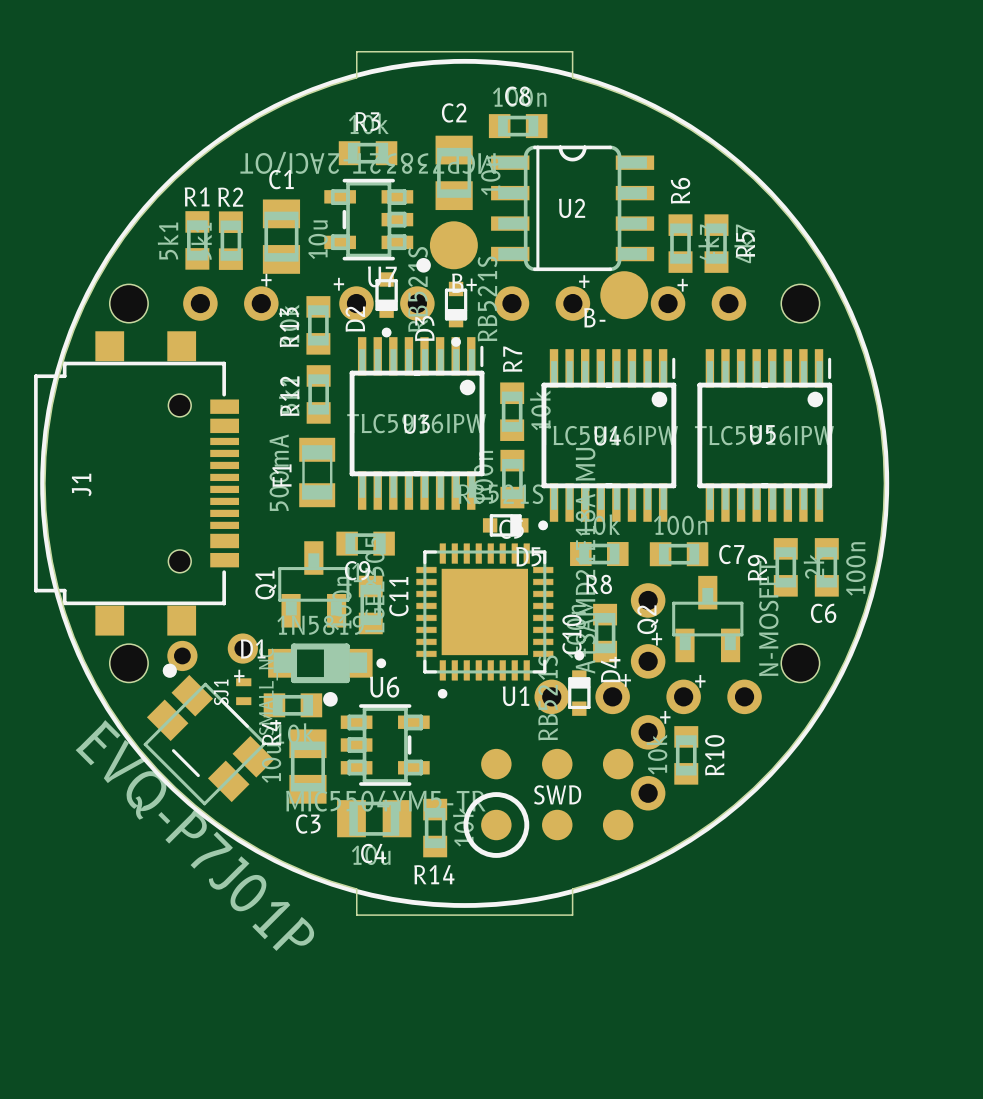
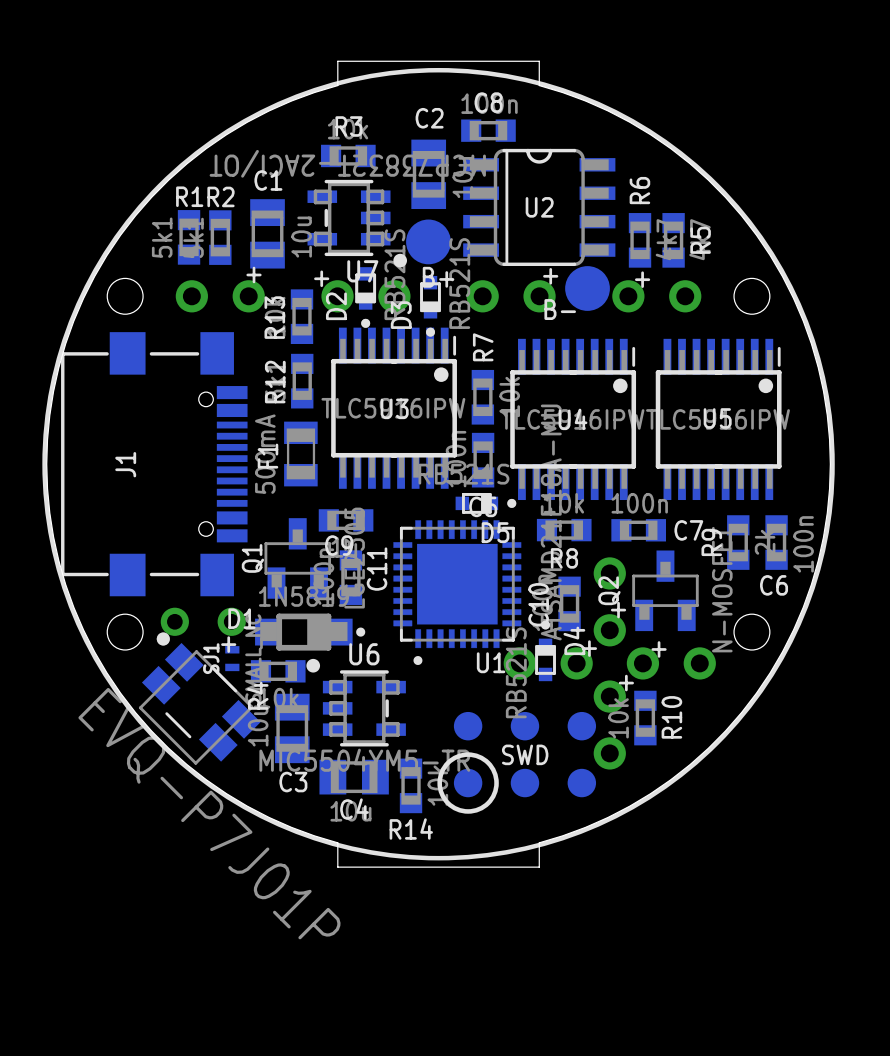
J1 footprint: [34, 331, 240, 636] -> [61, 332, 248, 597]
part rotation: 0° (212, 652) -> 7° clockwise (203, 621)

